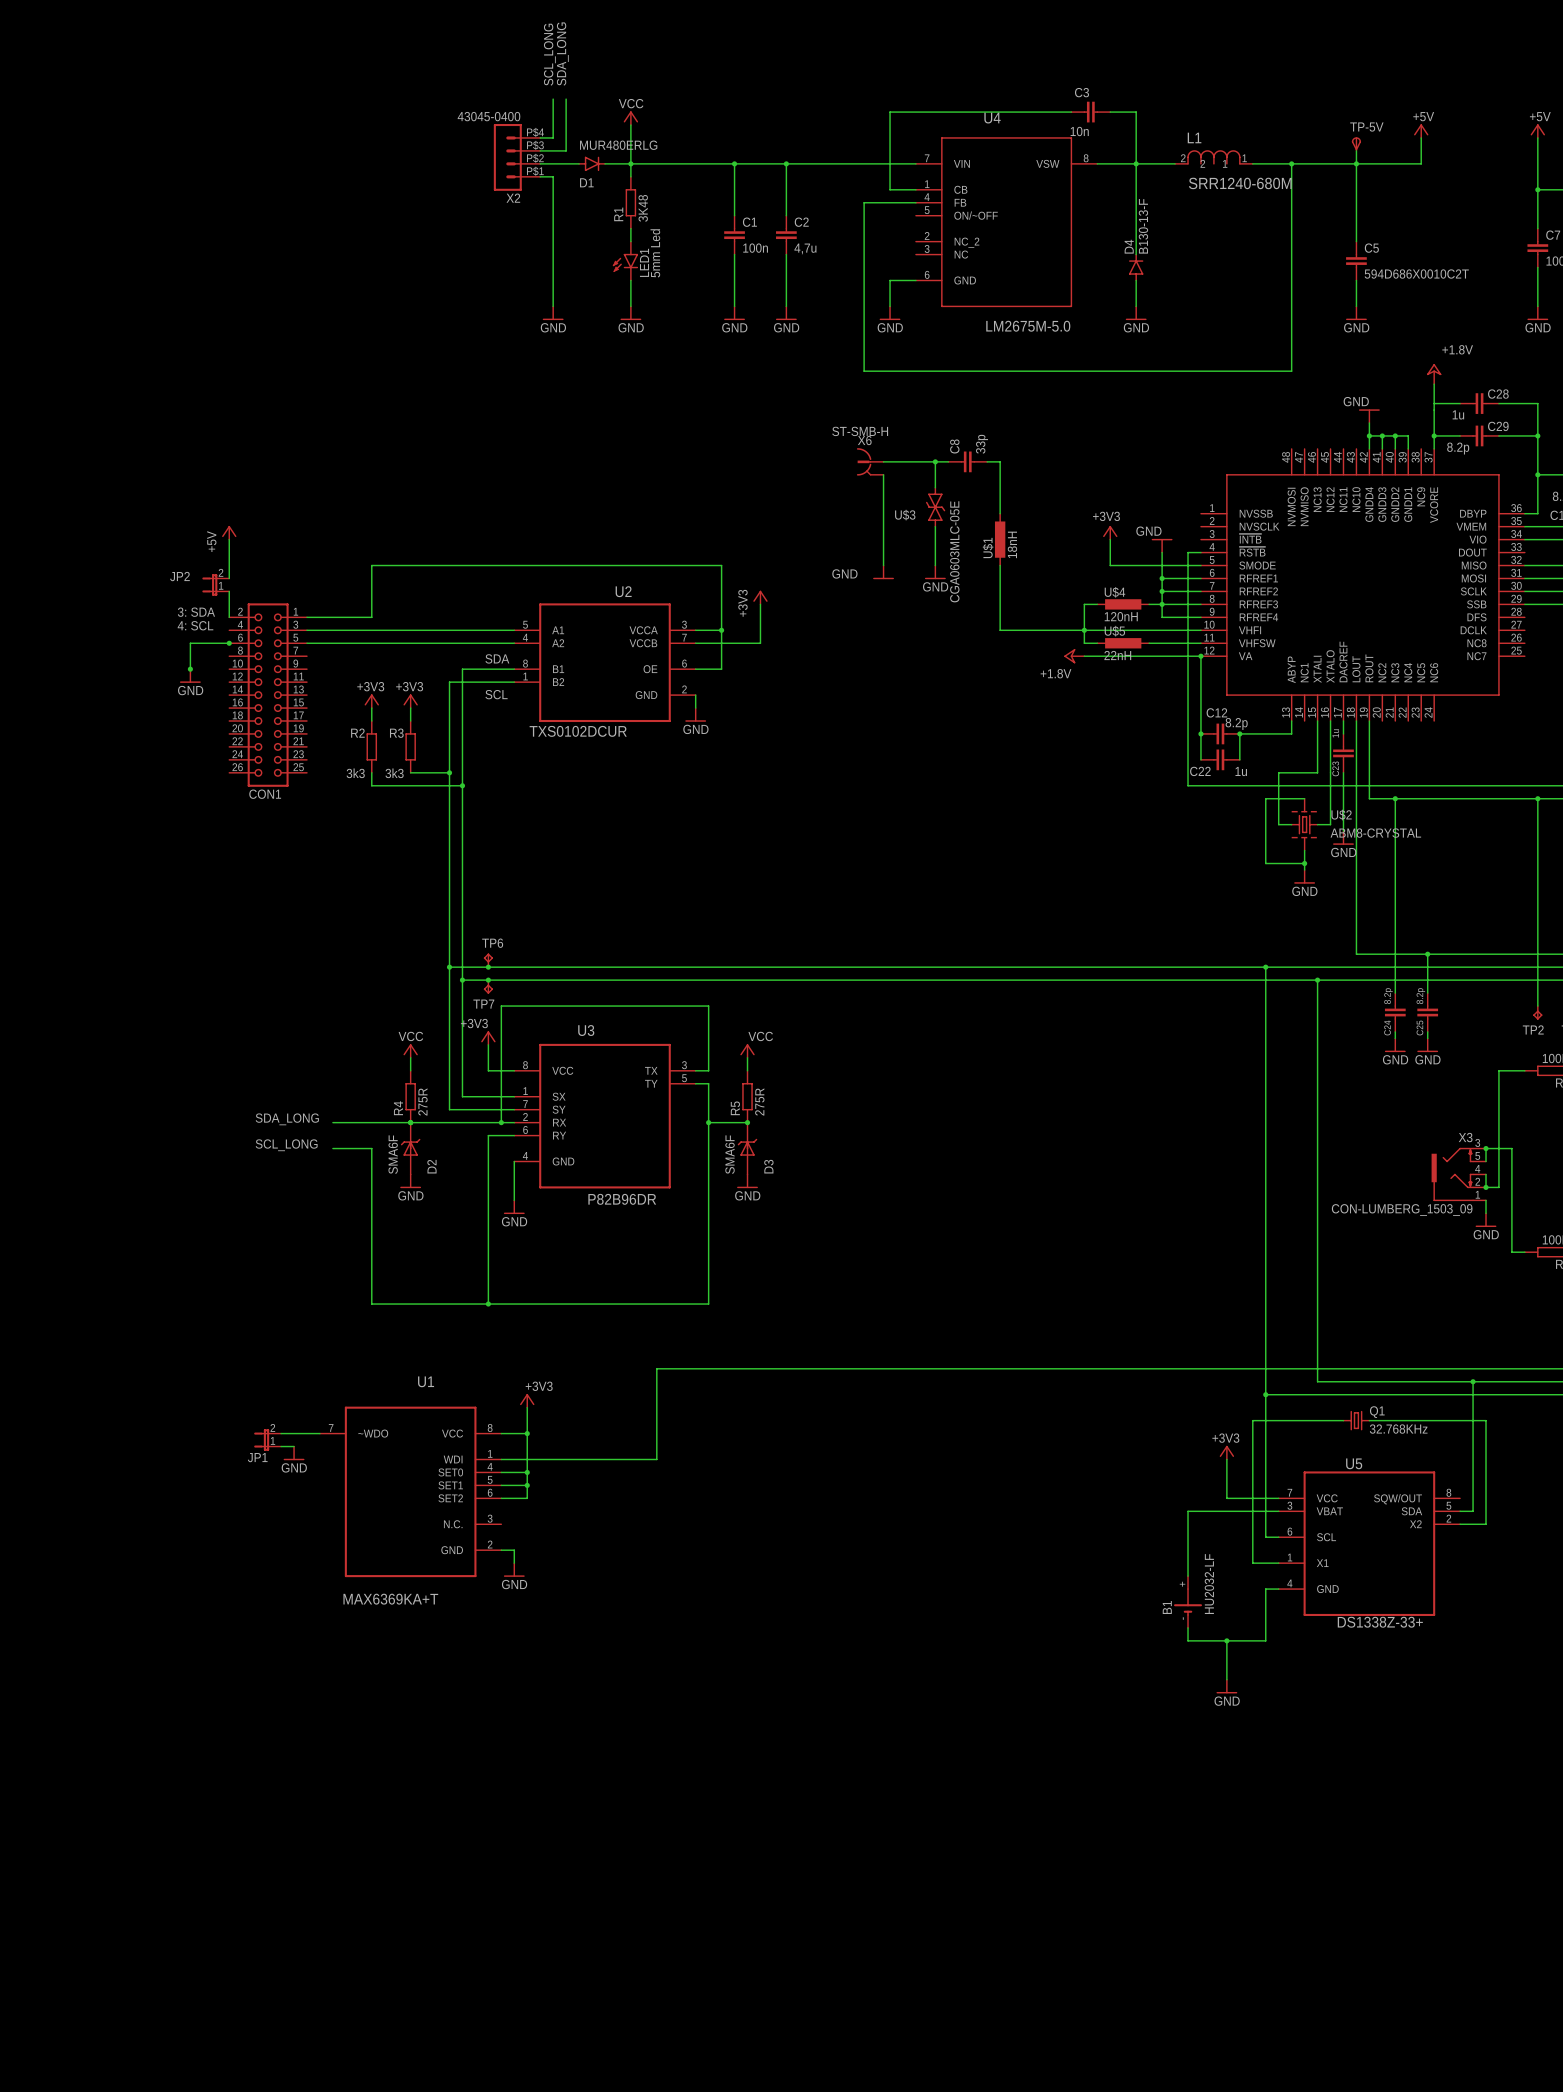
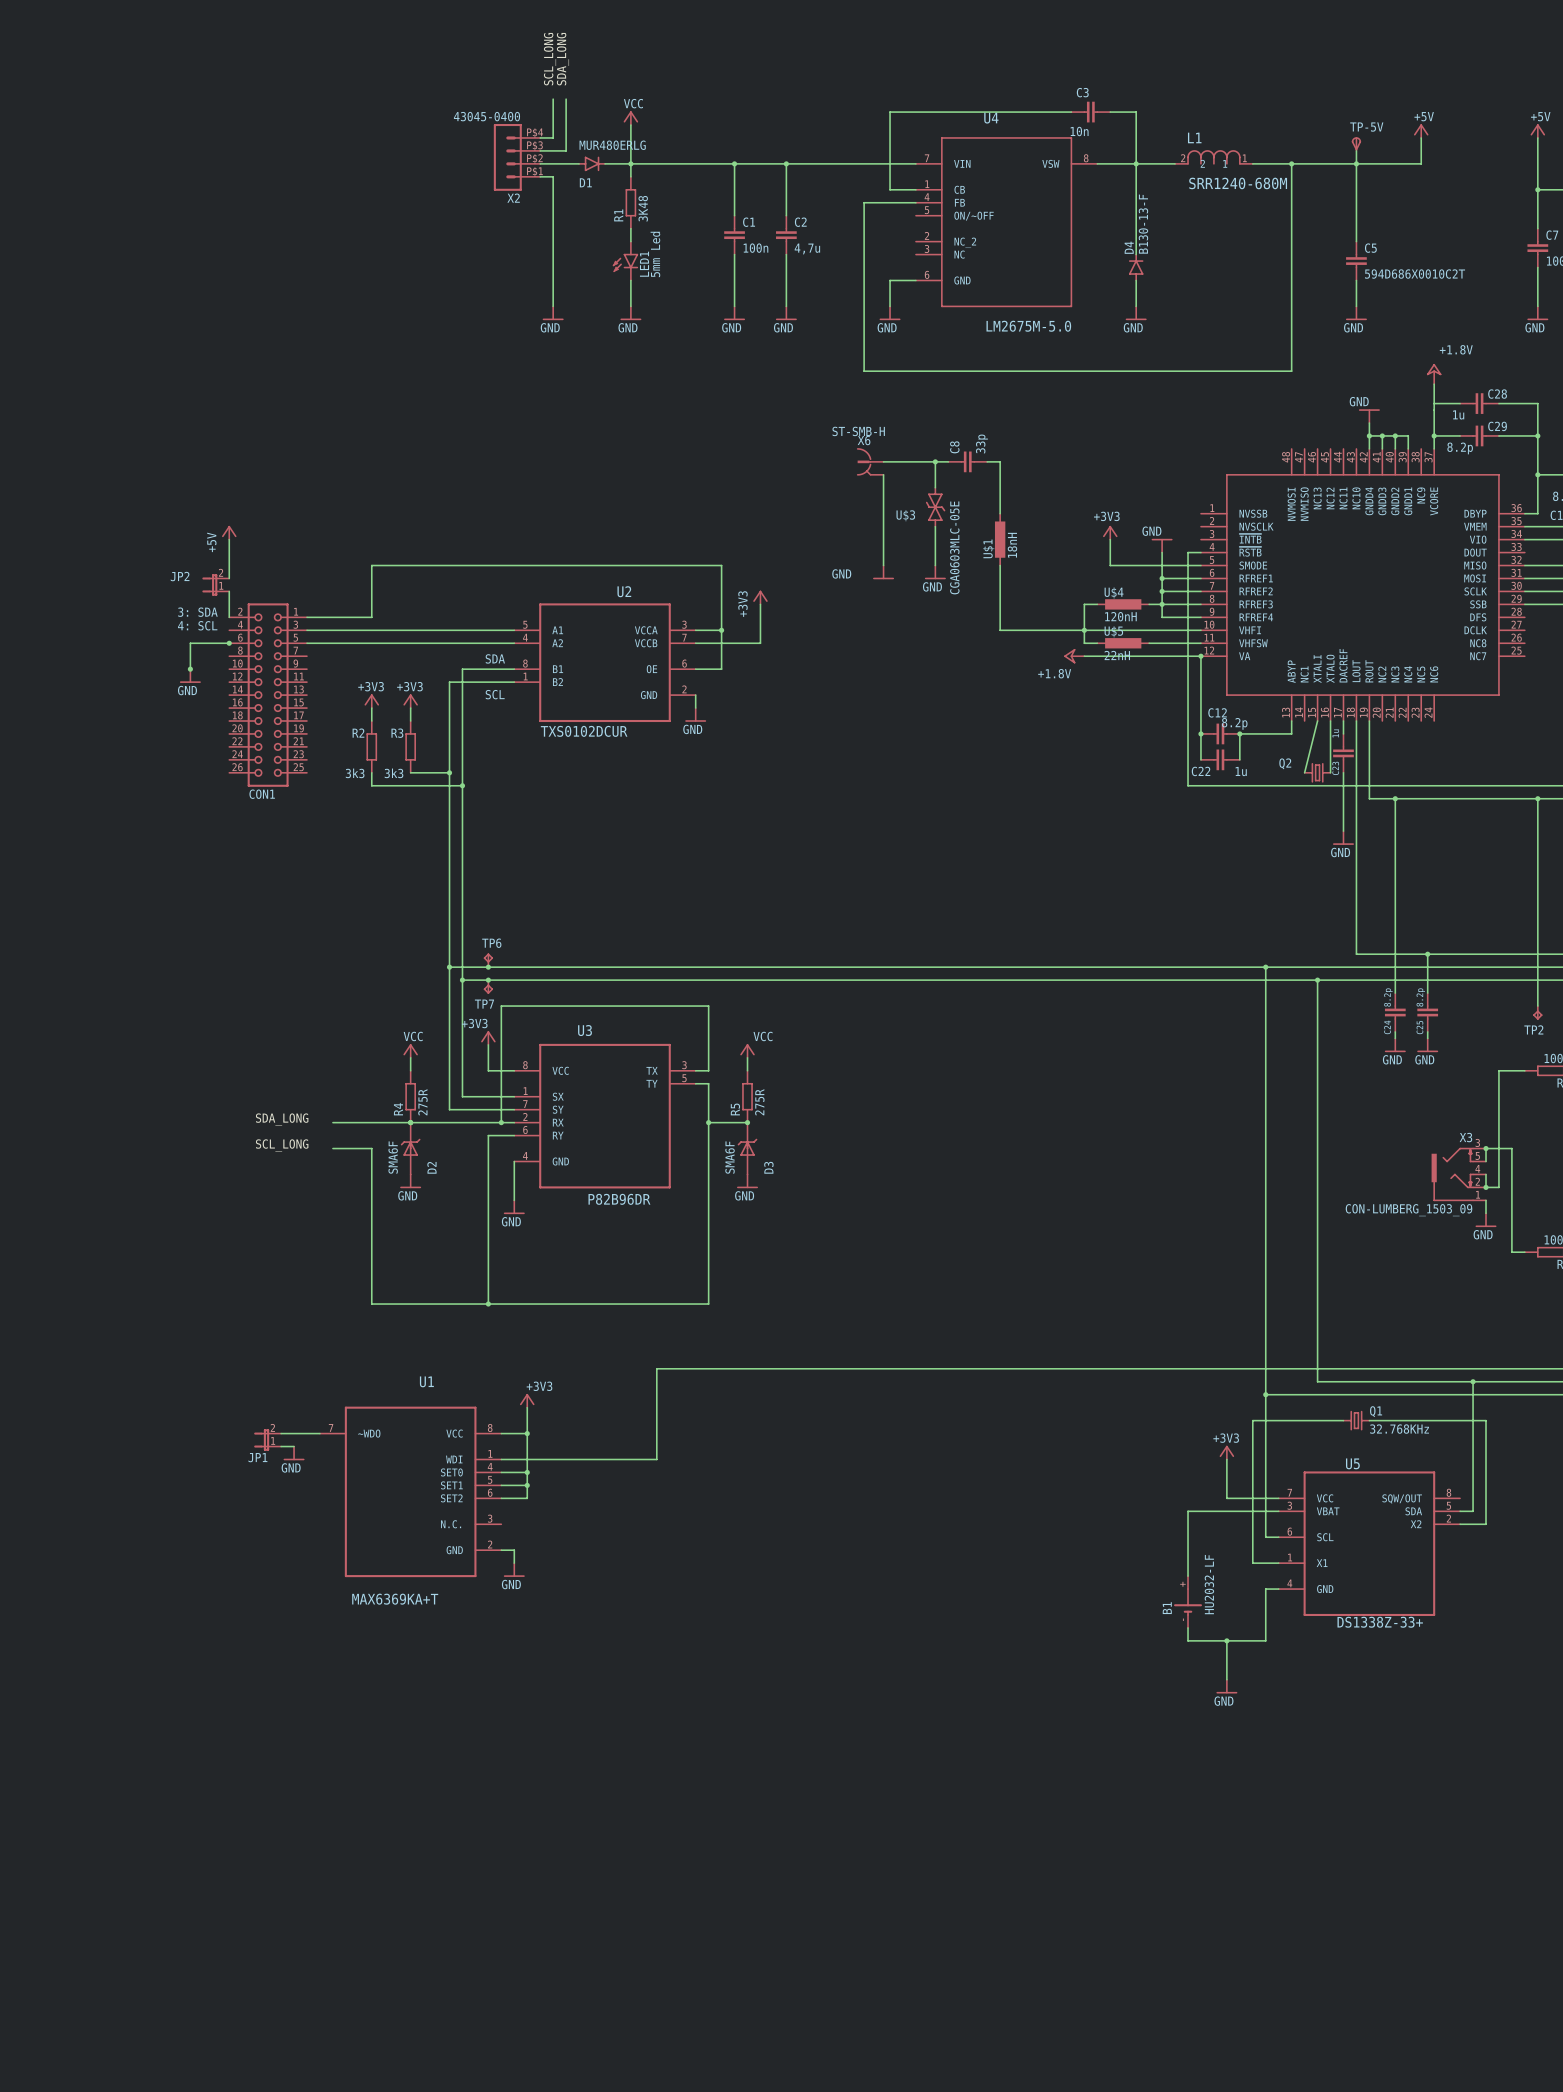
wire: (1317, 721) (1317, 772) (1278, 772) (1278, 824) (1291, 824) -> (1317, 721) (1304, 772)
Q2: none -> (1317, 772)
wire: (1330, 772) (1330, 824) (1317, 824) -> none
wire: (1304, 798) (1265, 798) (1265, 863) (1304, 863) -> none
U$2: ABM8-CRYSTAL (1304, 824) -> none
wire: (1304, 850) (1304, 869) -> none
junction: (1304, 863) -> none
power symbol: GND (1304, 876) -> none

